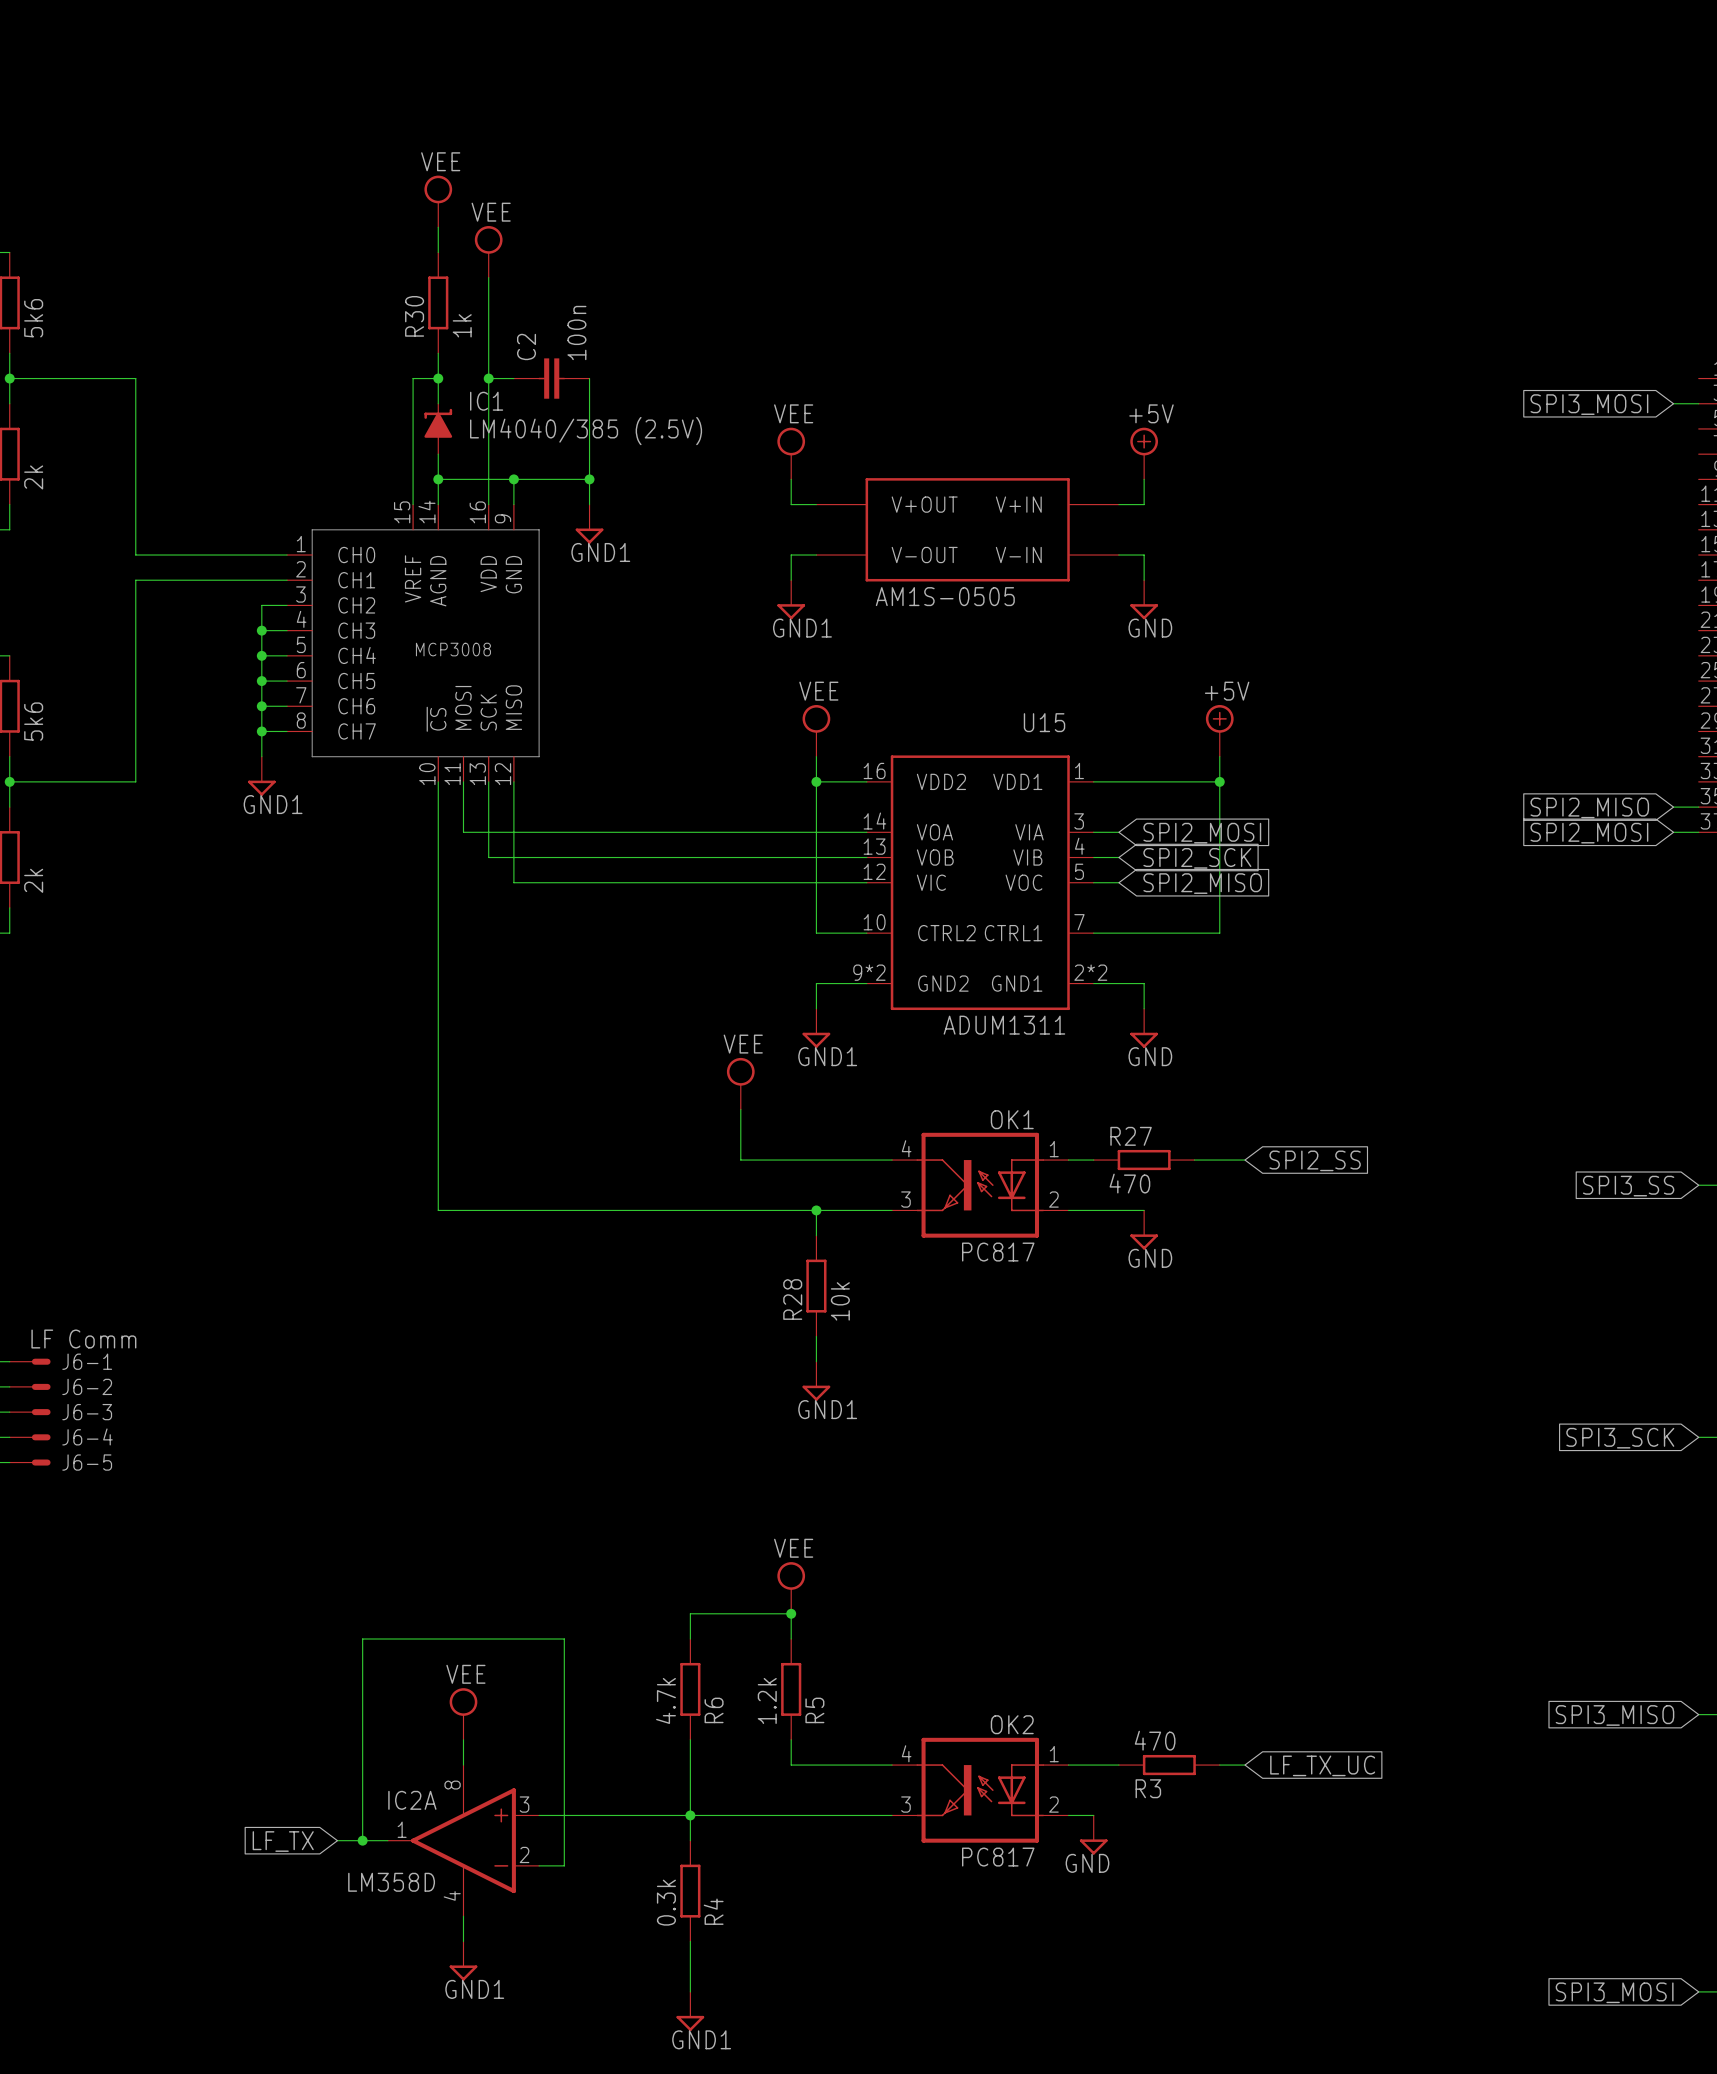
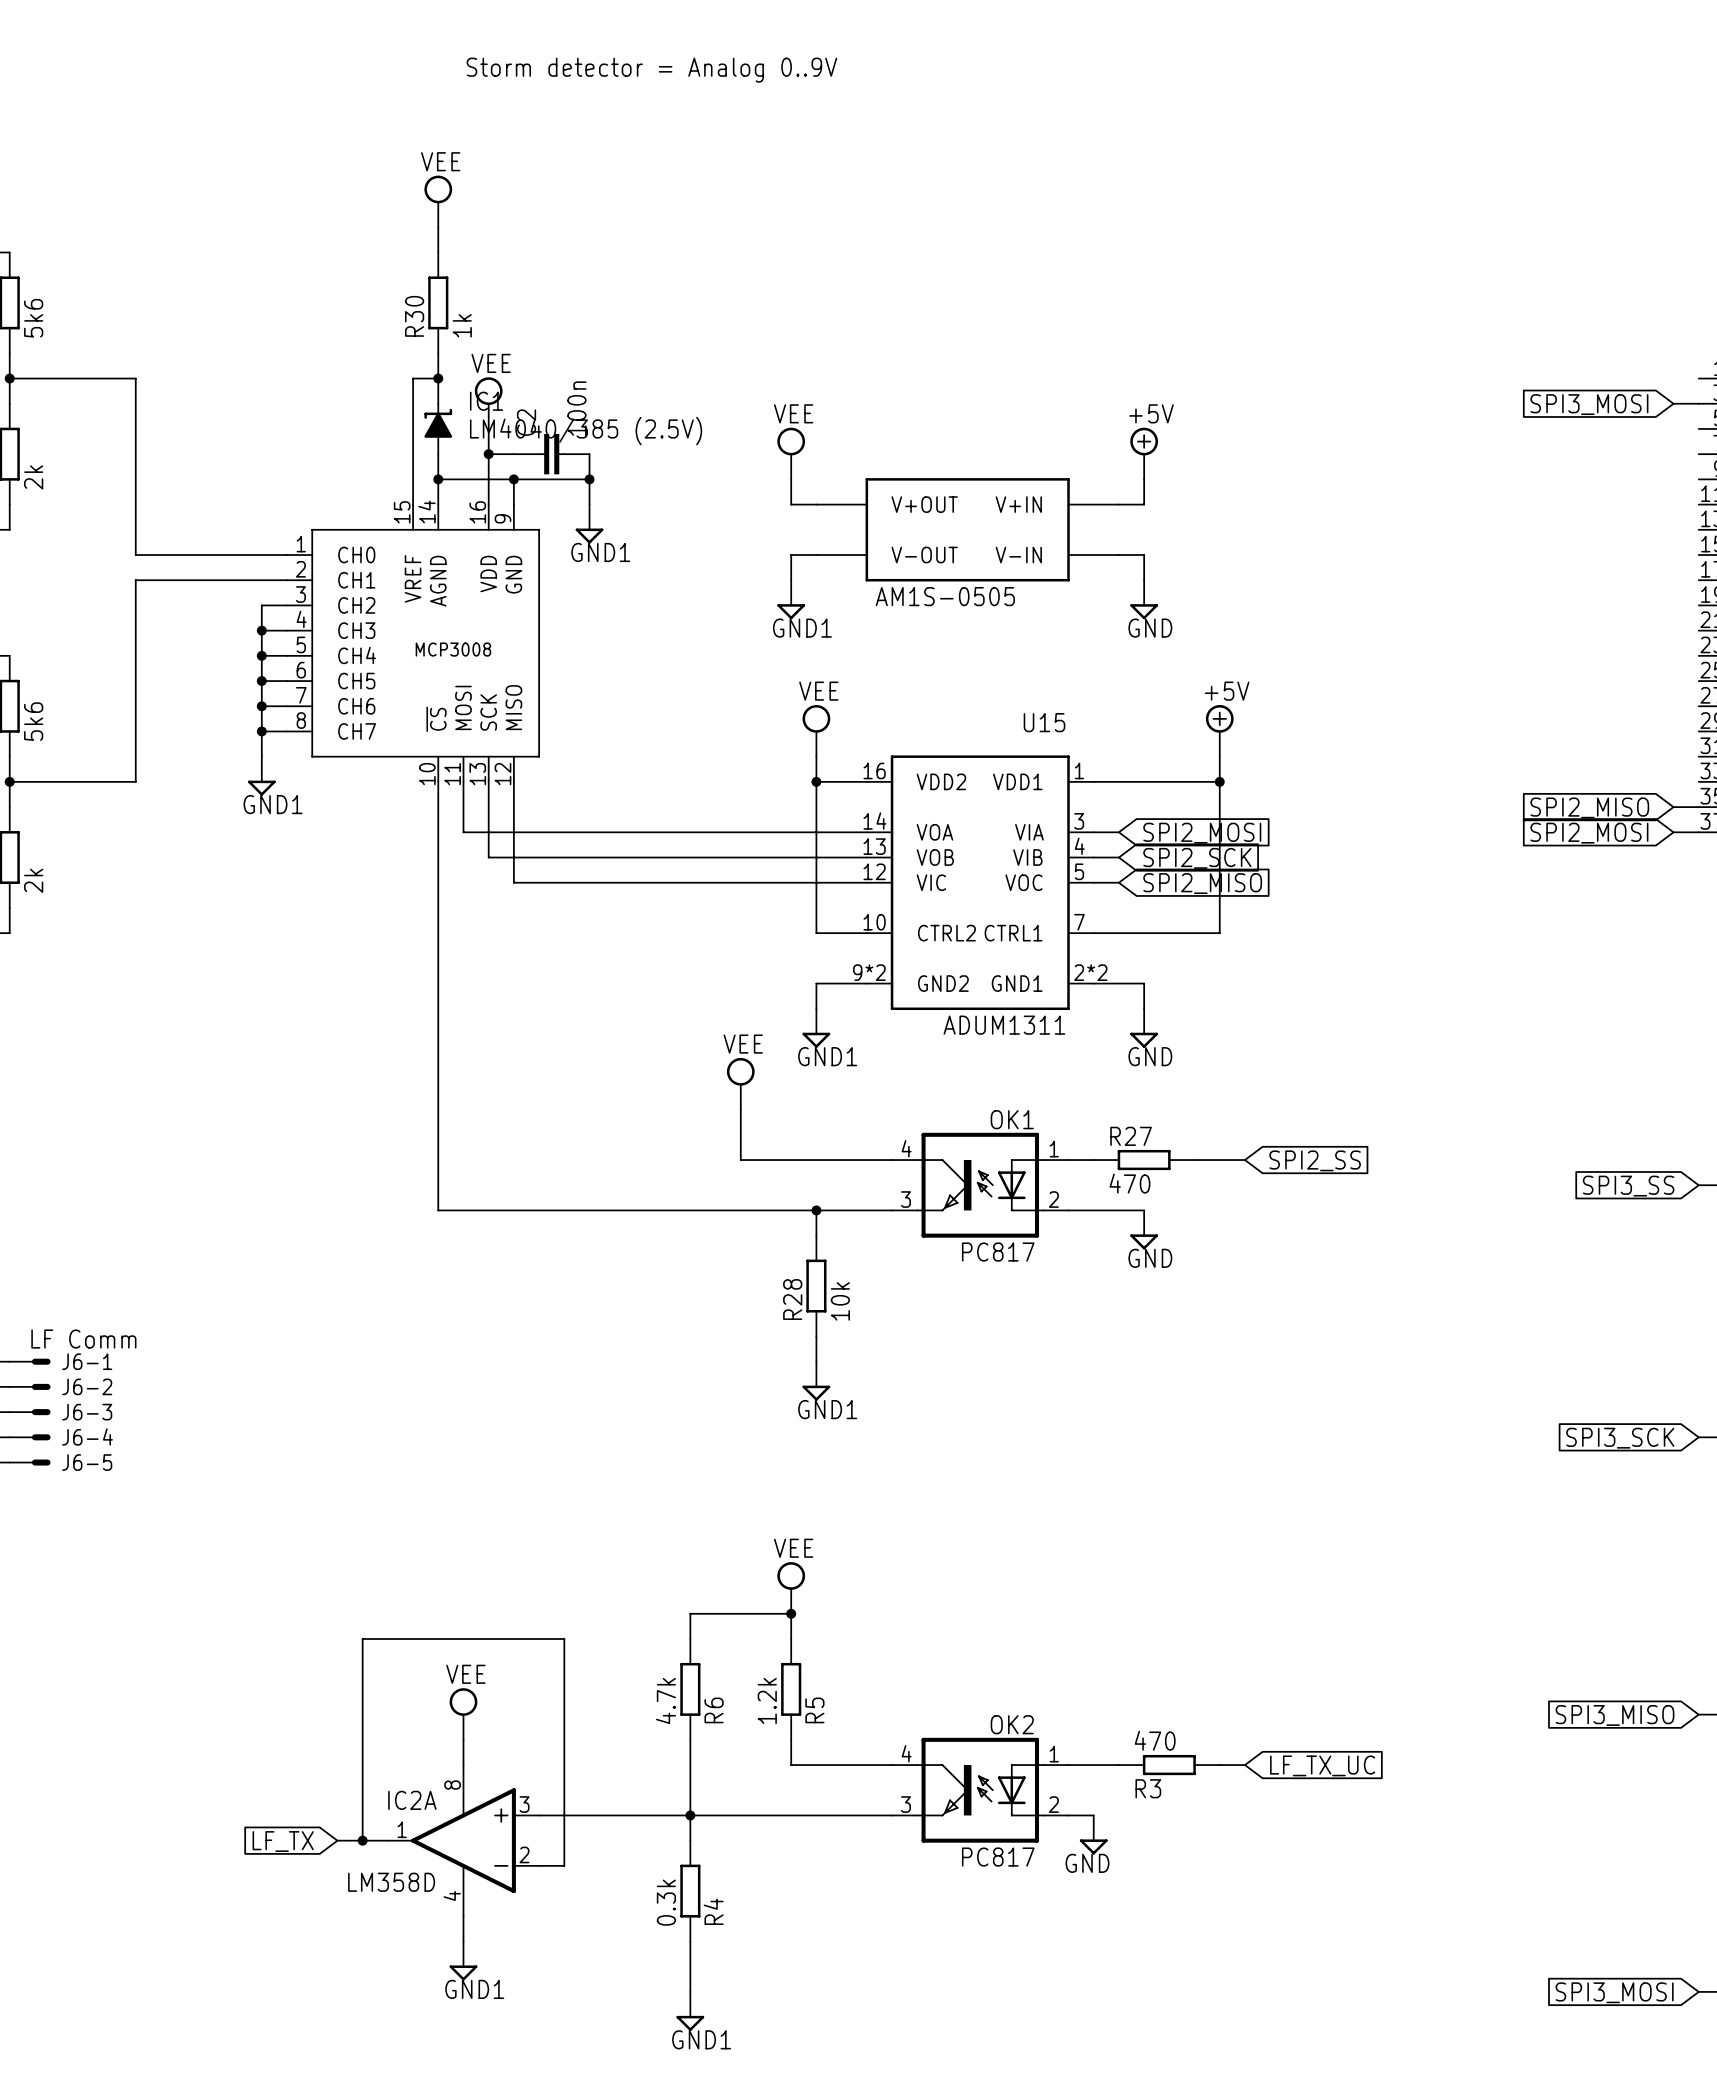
text: none -> Storm detector = Analog 0..9V (651, 70)
power symbol position: VEE (488, 251) -> VEE (488, 403)
wire: (488, 277) (488, 428) -> none
wire: (488, 378) (513, 378) -> (488, 454) (513, 454)
junction: (488, 378) -> none
C2 position: (551, 378) -> (551, 454)
wire: (589, 378) (589, 454) -> none
junction: none -> (488, 454)

